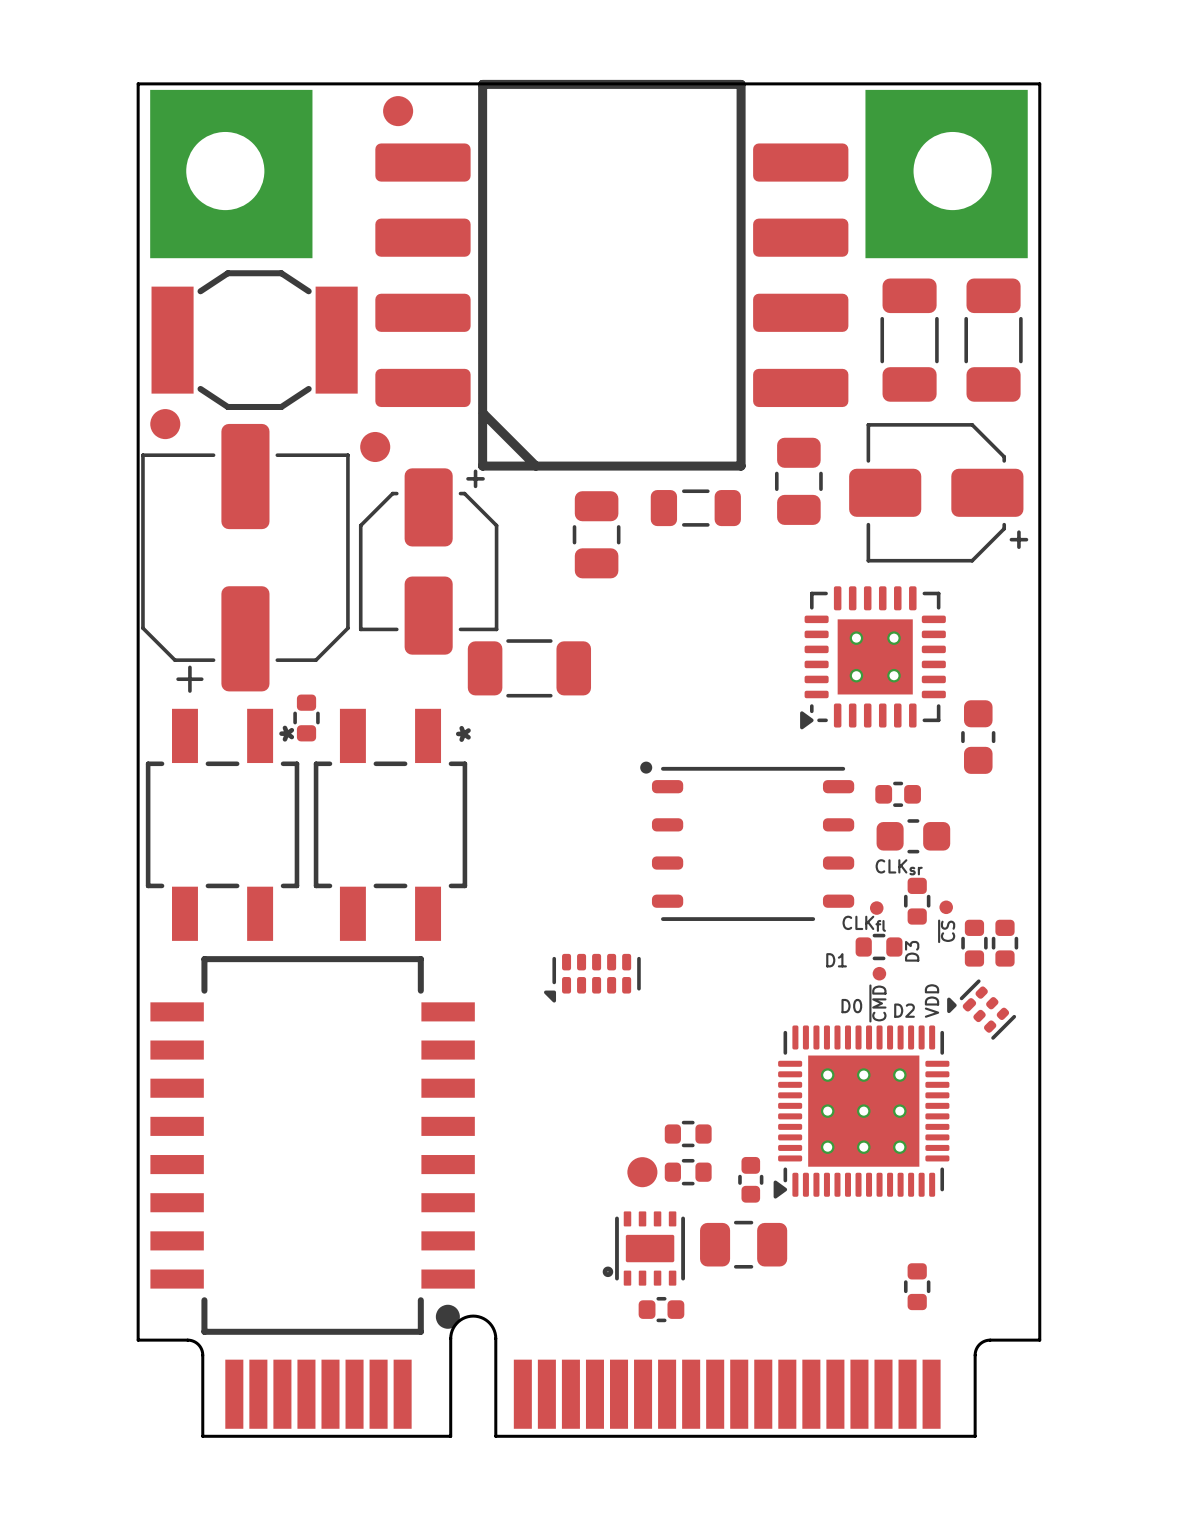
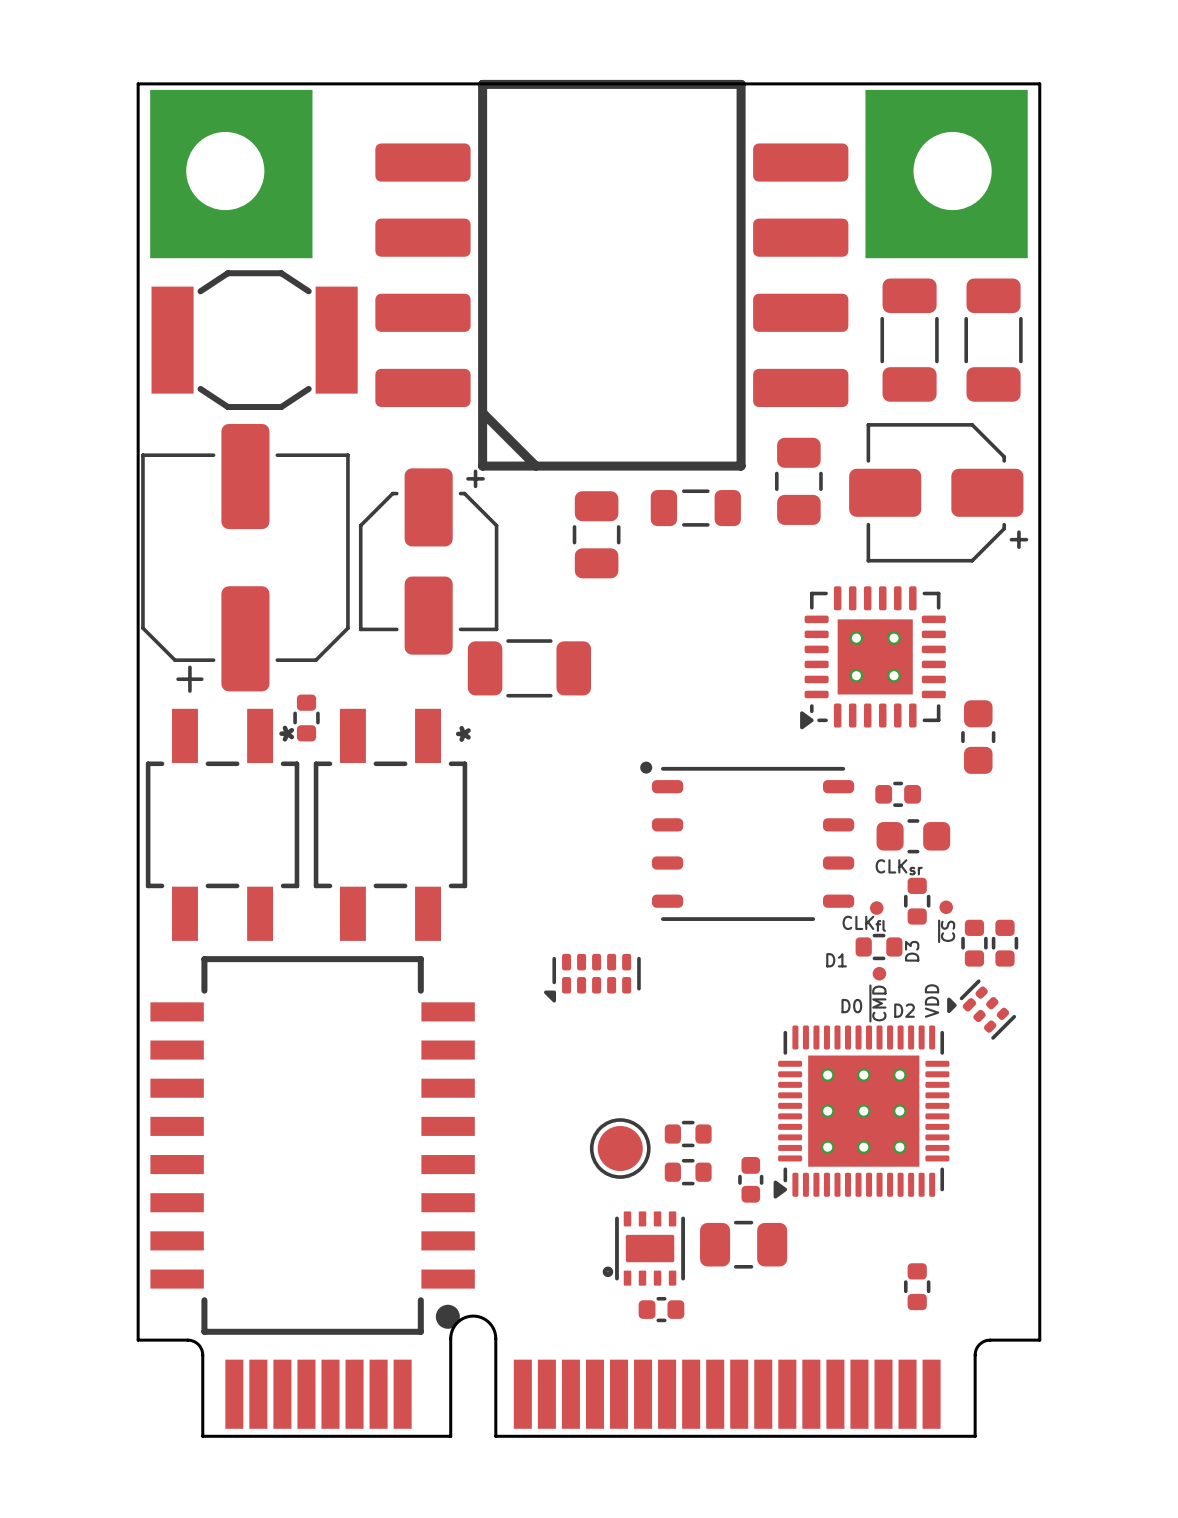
part: (398, 111) -> none
part: (165, 424) -> none
part: (375, 446) -> none
part: none -> (620, 1148)
part: (642, 1172) -> none

